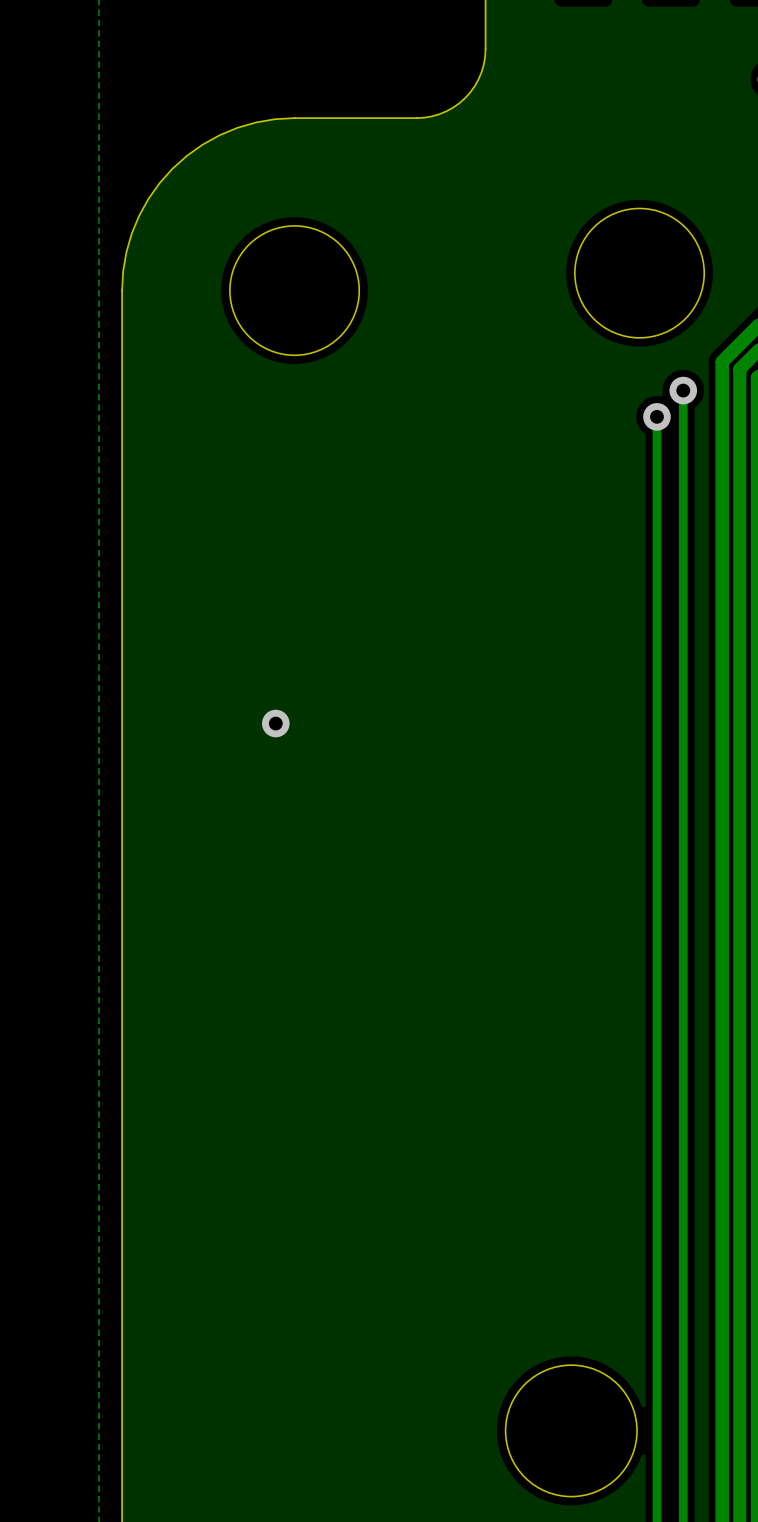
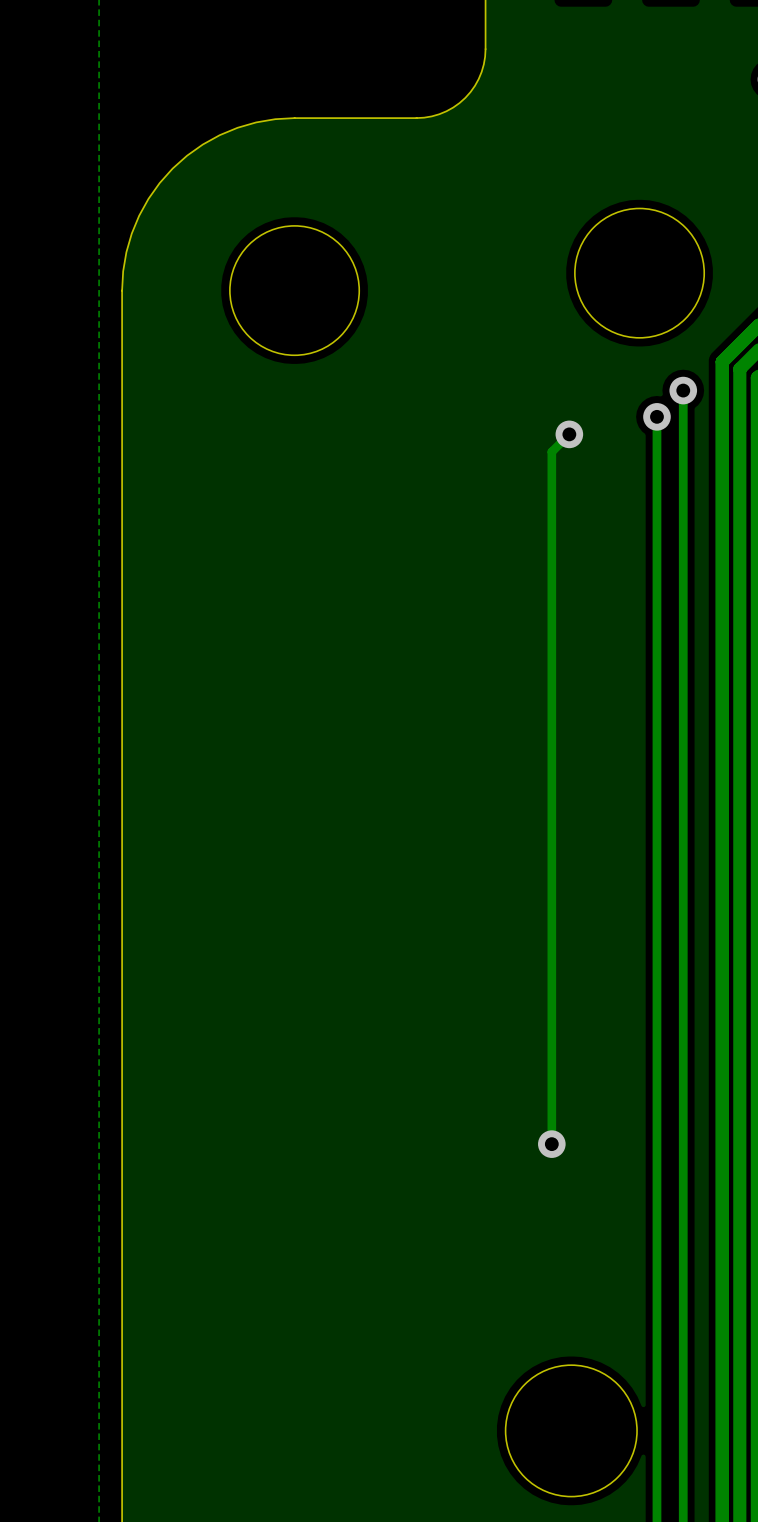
track: none -> (569, 434) (551, 451) (551, 1144)
via: none -> (569, 434)
via: (275, 723) -> none
via: none -> (551, 1144)

